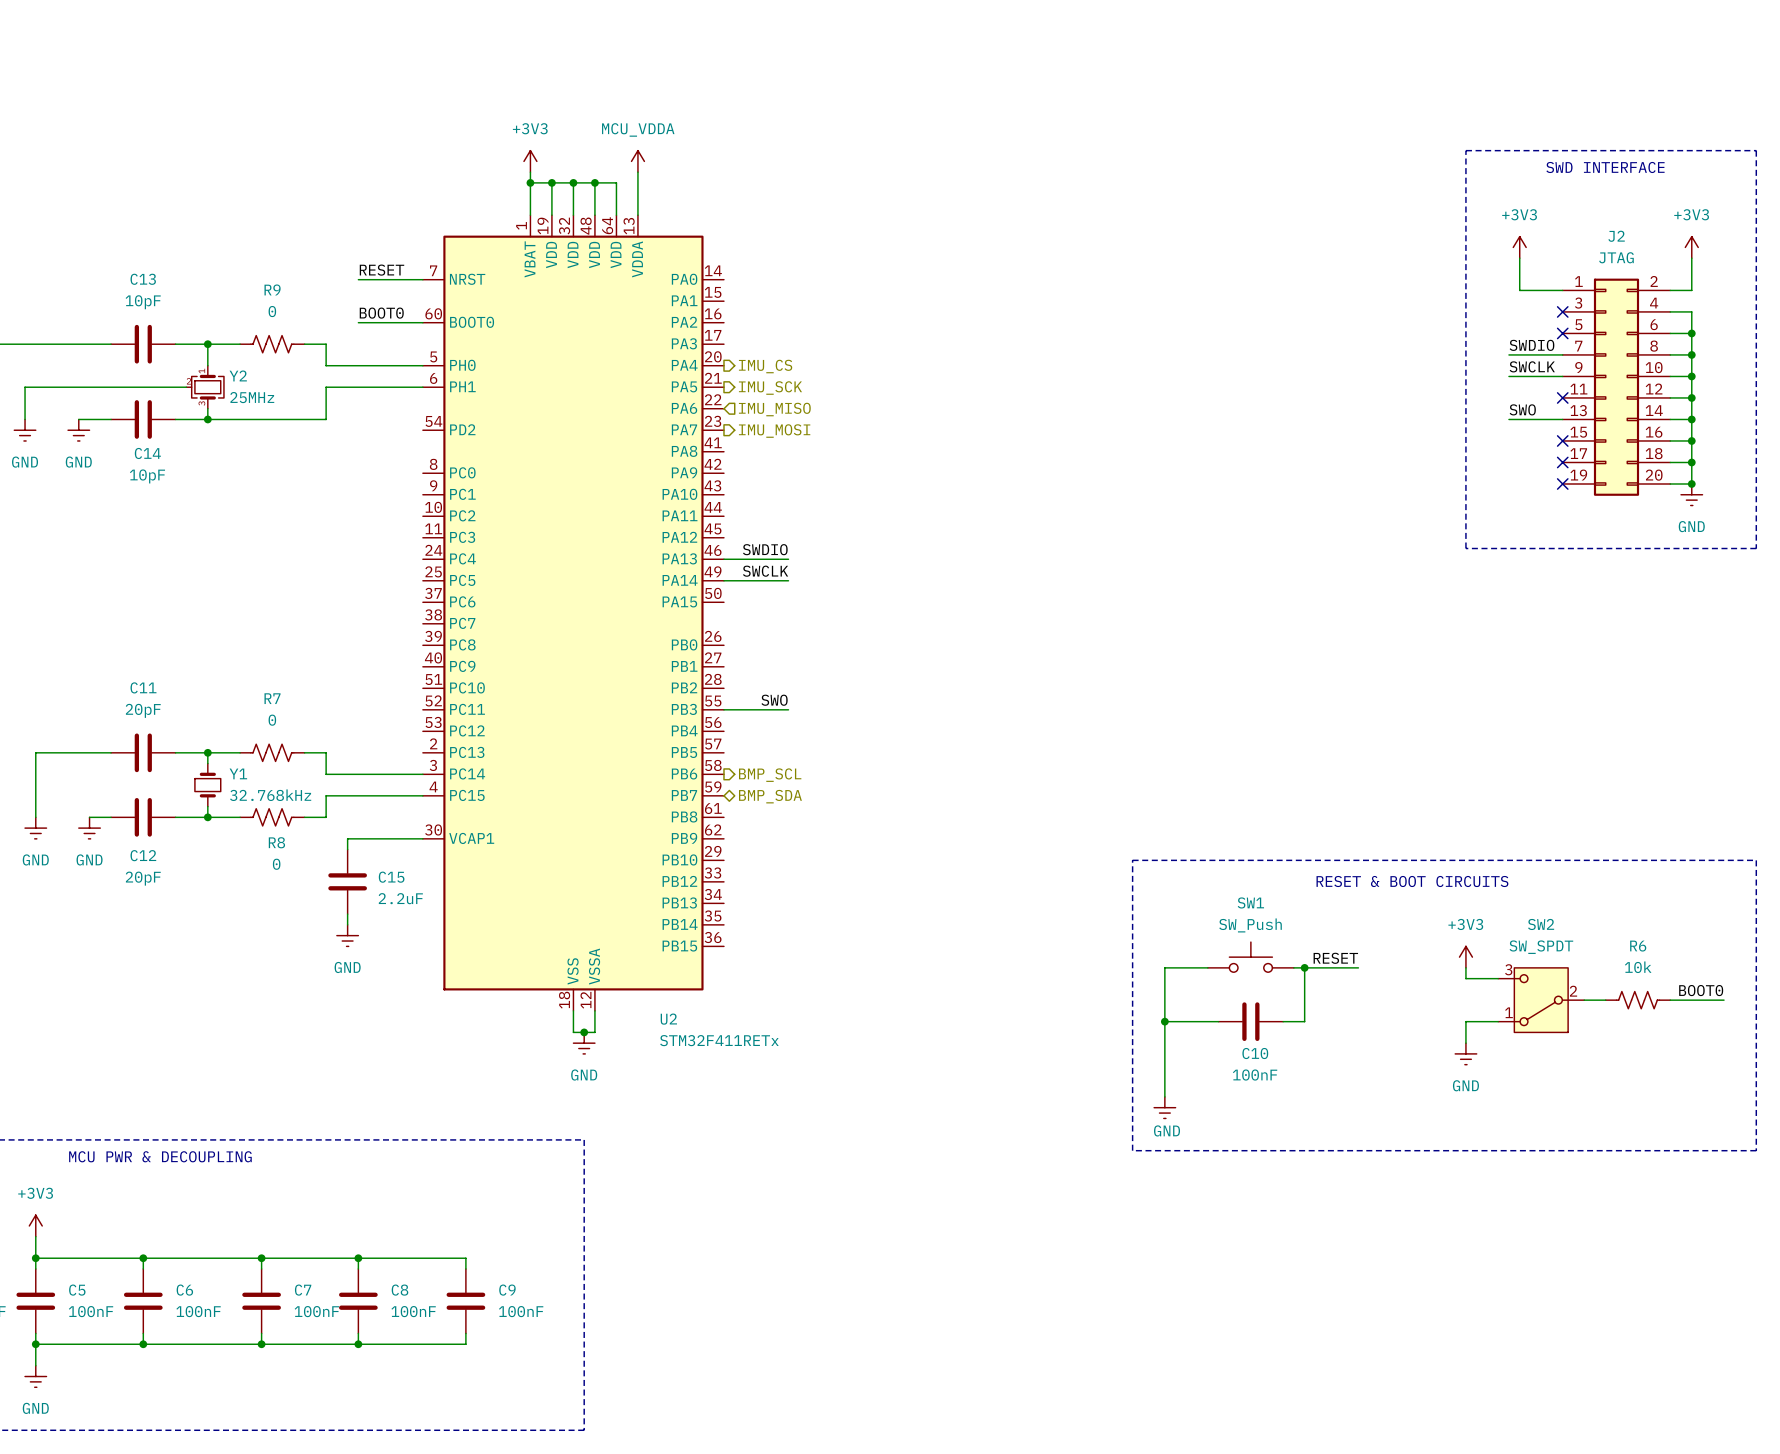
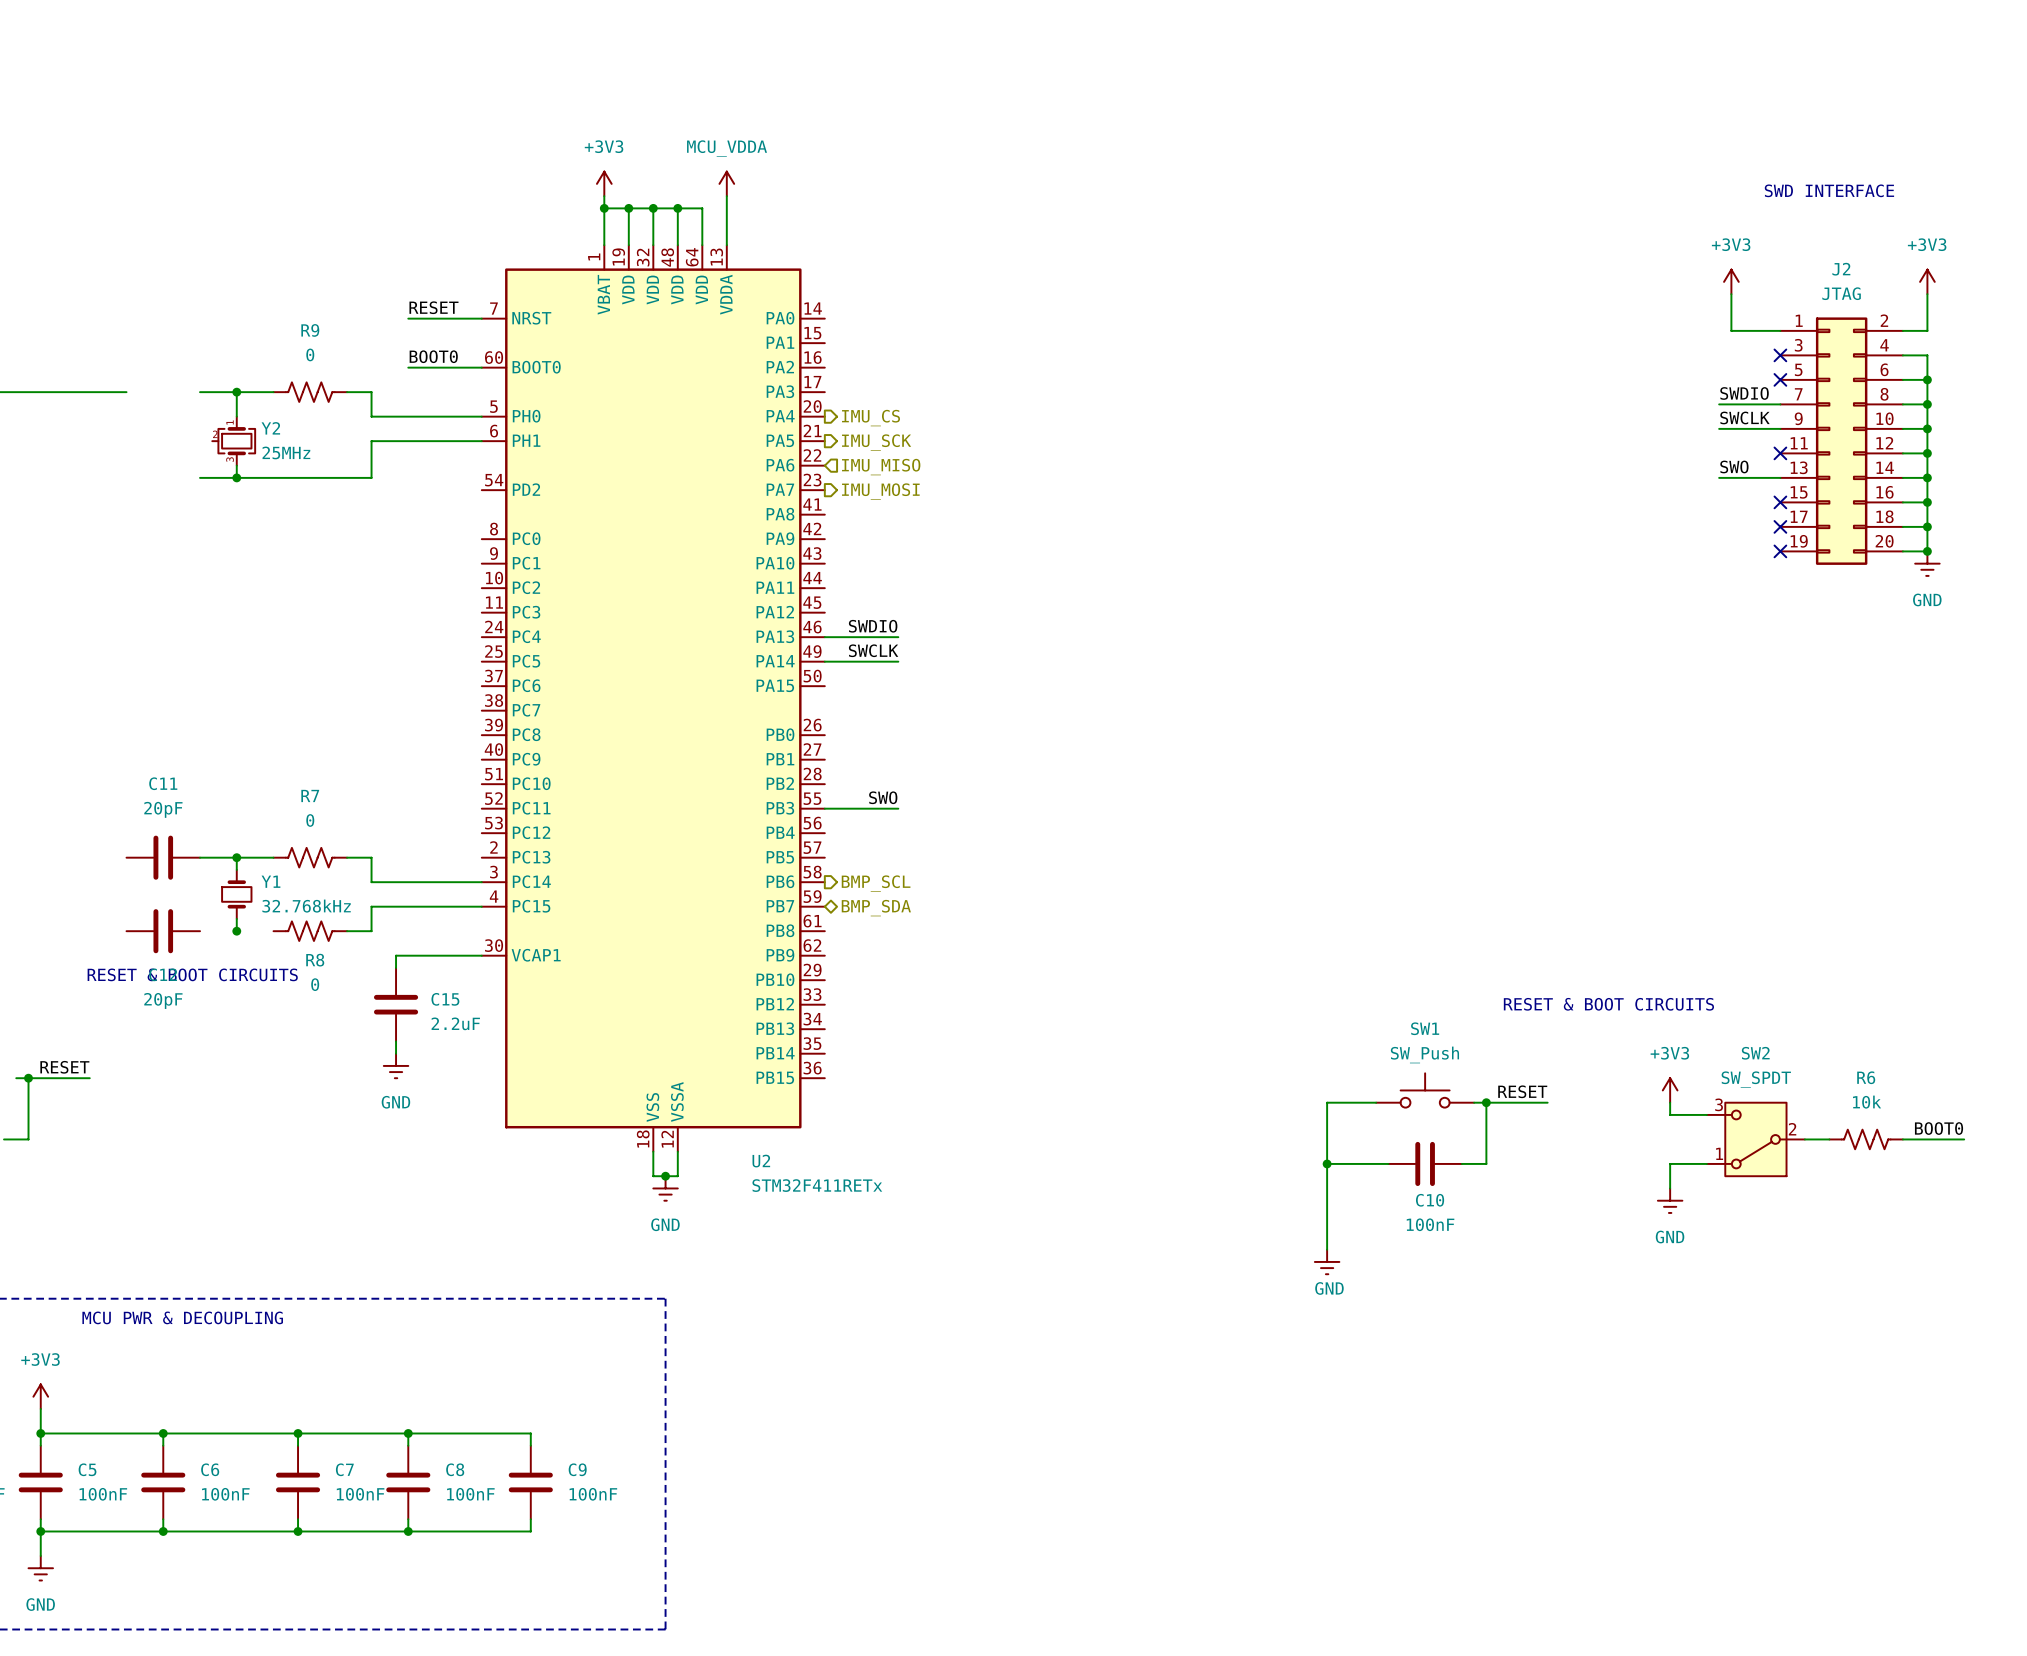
line: (1465, 150) (1756, 150) (1756, 548) (1465, 548) (1465, 150) -> none
C13: 10pF (143, 344) -> none
wire: (186, 387) (25, 387) (25, 419) -> none
wire: (78, 419) (111, 419) -> none
C14: 10pF (143, 419) -> none
power symbol: GND (25, 430) -> none
power symbol: GND (78, 430) -> none
wire: (111, 752) (35, 752) (35, 817) -> none
wire: (89, 817) (111, 817) -> none
wire: (175, 817) (240, 817) -> (16, 1078) (89, 1078)
power symbol: GND (35, 828) -> none
power symbol: GND (89, 828) -> none
text: none -> RESET & BOOT CIRCUITS (192, 974)
line: (1132, 860) (1756, 860) (1756, 1150) (1132, 1150) (1132, 860) -> none
label: none -> RESET (64, 1067)
wire: none -> (28, 1078) (28, 1139) (4, 1139)
junction: none -> (28, 1078)

